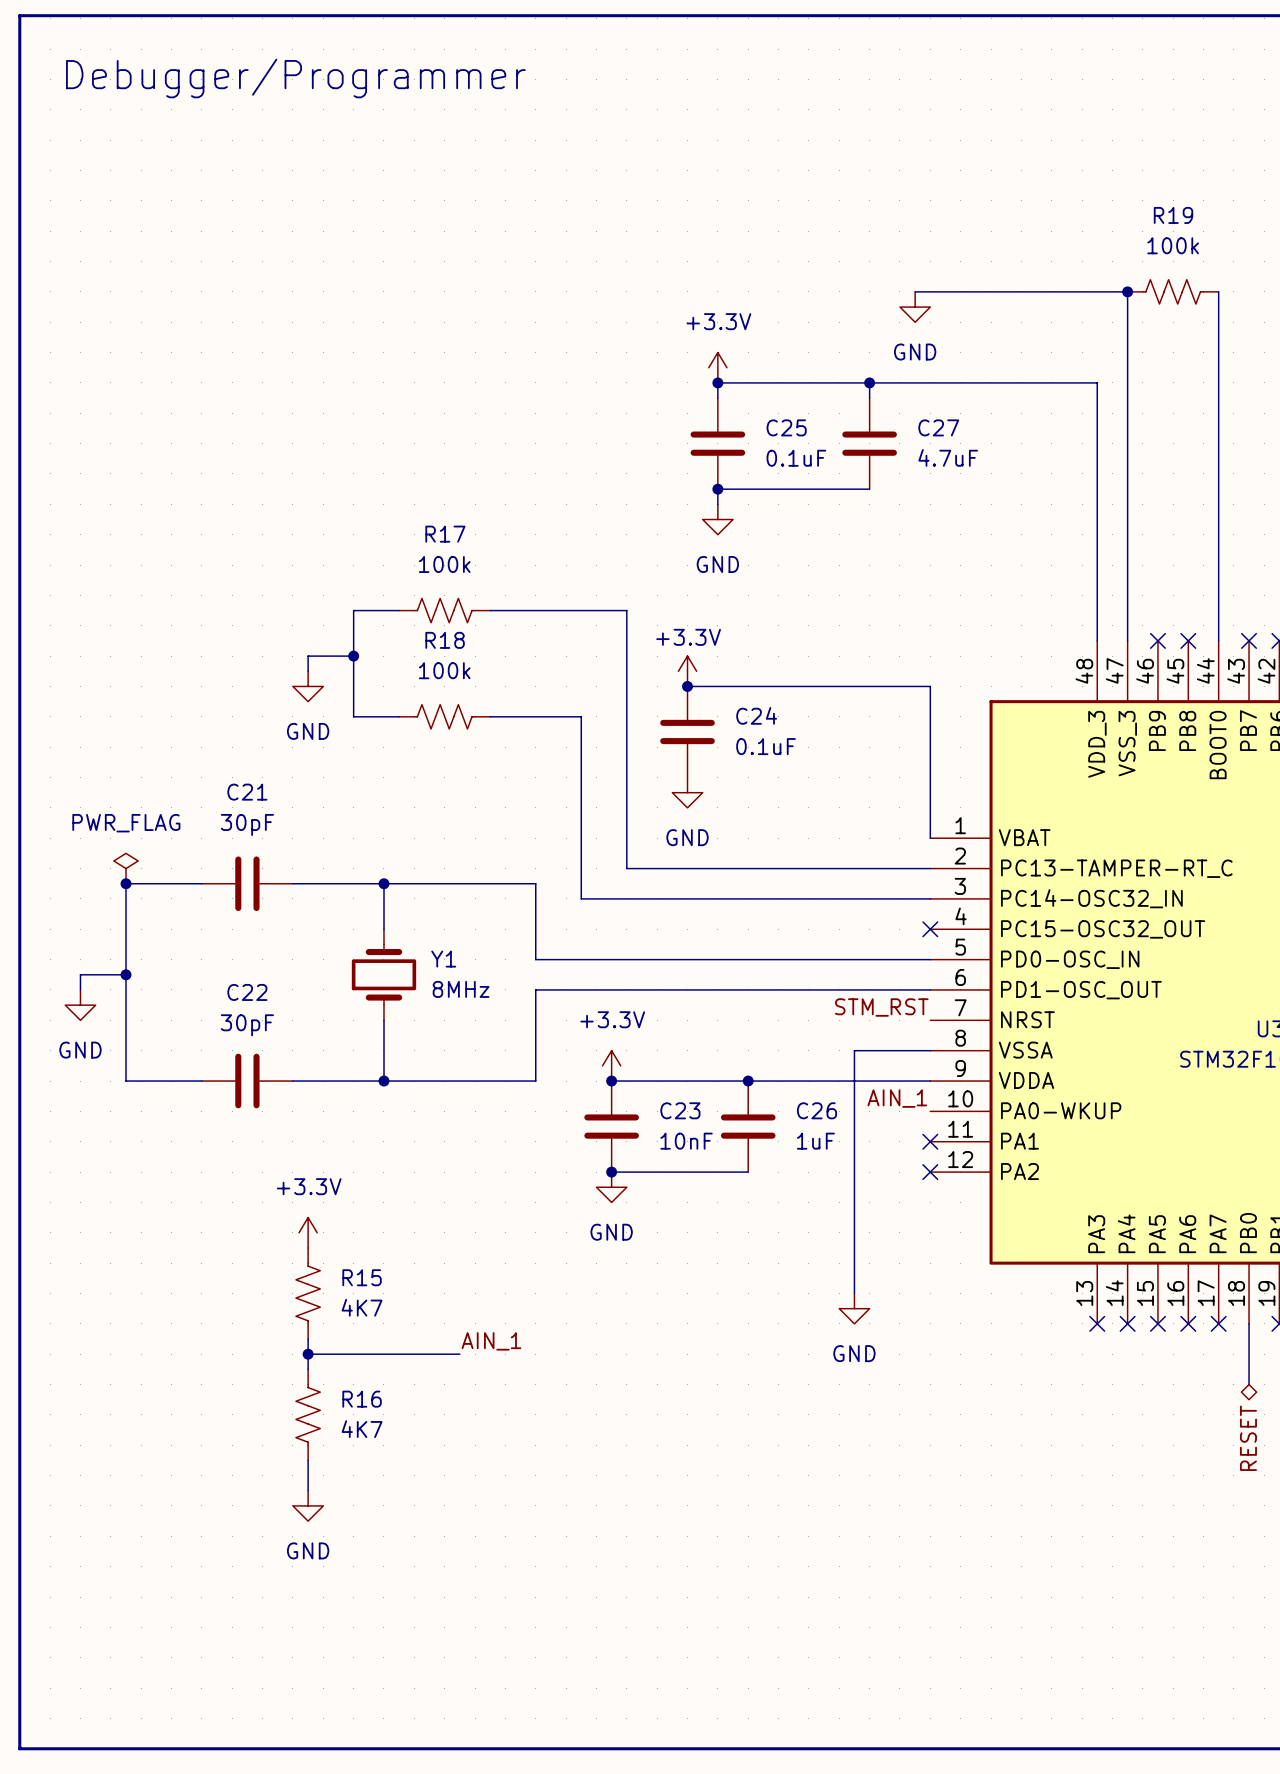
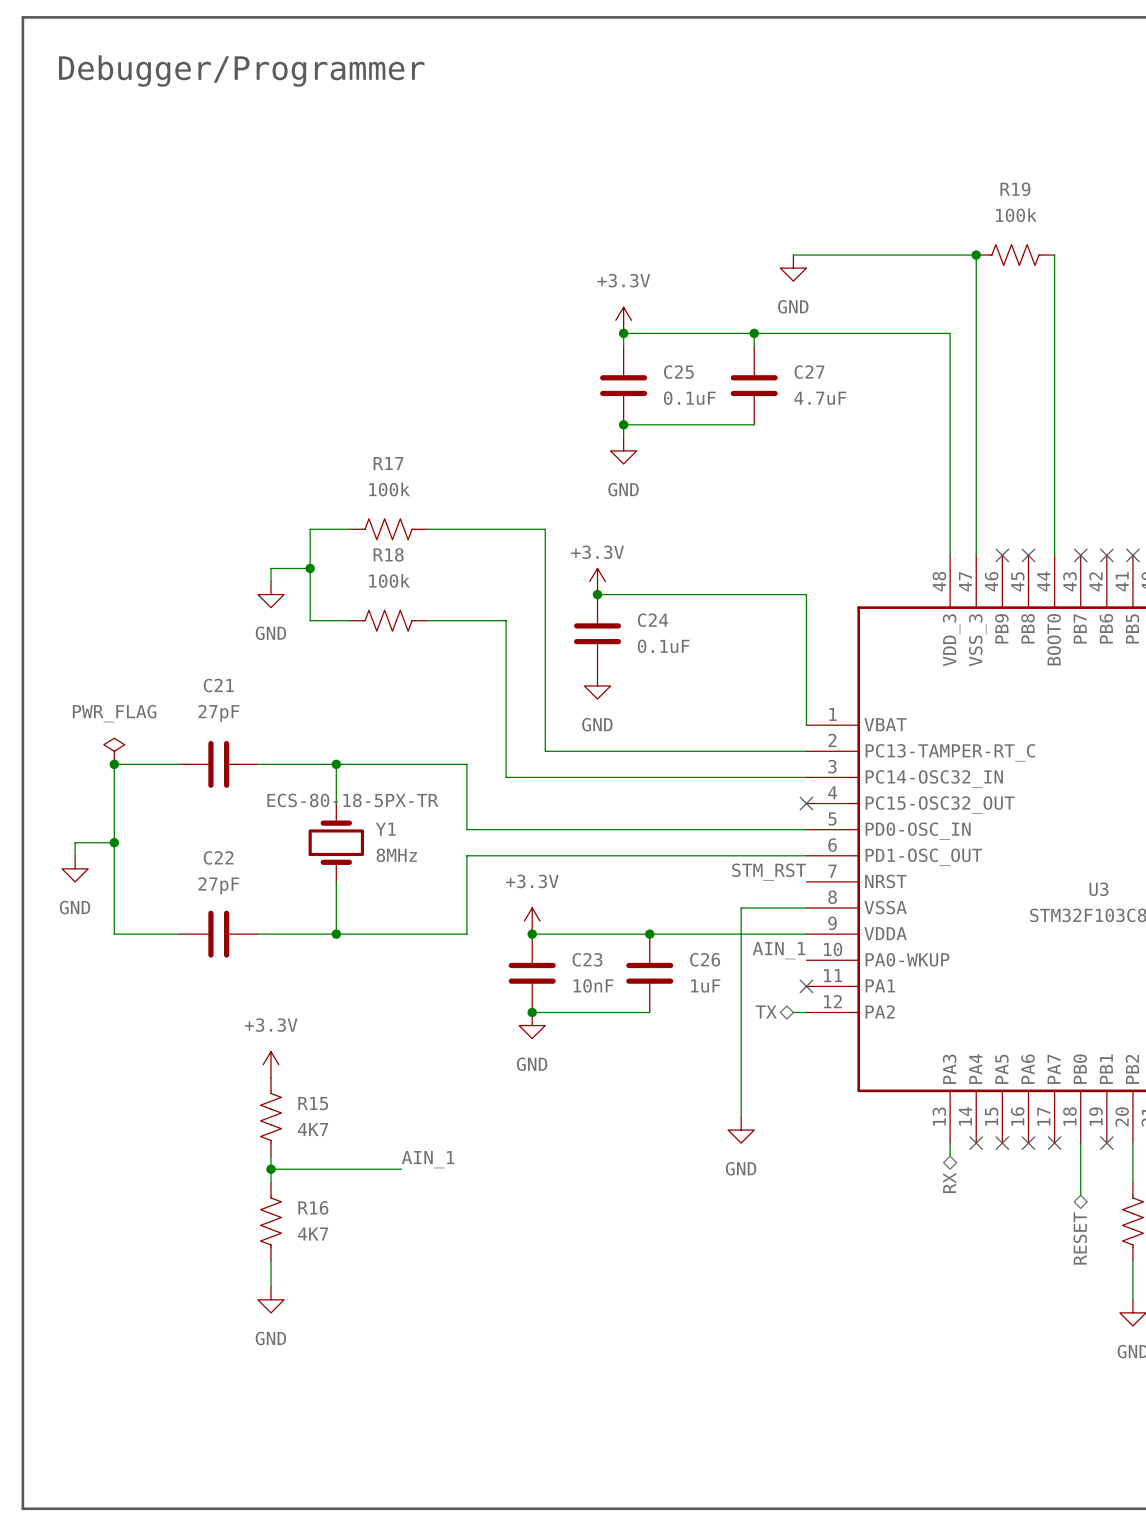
C21 value: 30pF (247, 825) -> 27pF (218, 713)
Y1 text: none -> ECS-80-18-5PX-TR (352, 800)
C22 value: 30pF (247, 1025) -> 27pF (218, 885)
hierarchical label: none -> TX (766, 1012)
wire: none -> (793, 1012) (806, 1012)
no-connect mark: (930, 1172) -> none
wire: none -> (950, 1143) (950, 1156)
no-connect mark: (1097, 1323) -> none
hierarchical label: none -> RX (949, 1182)

